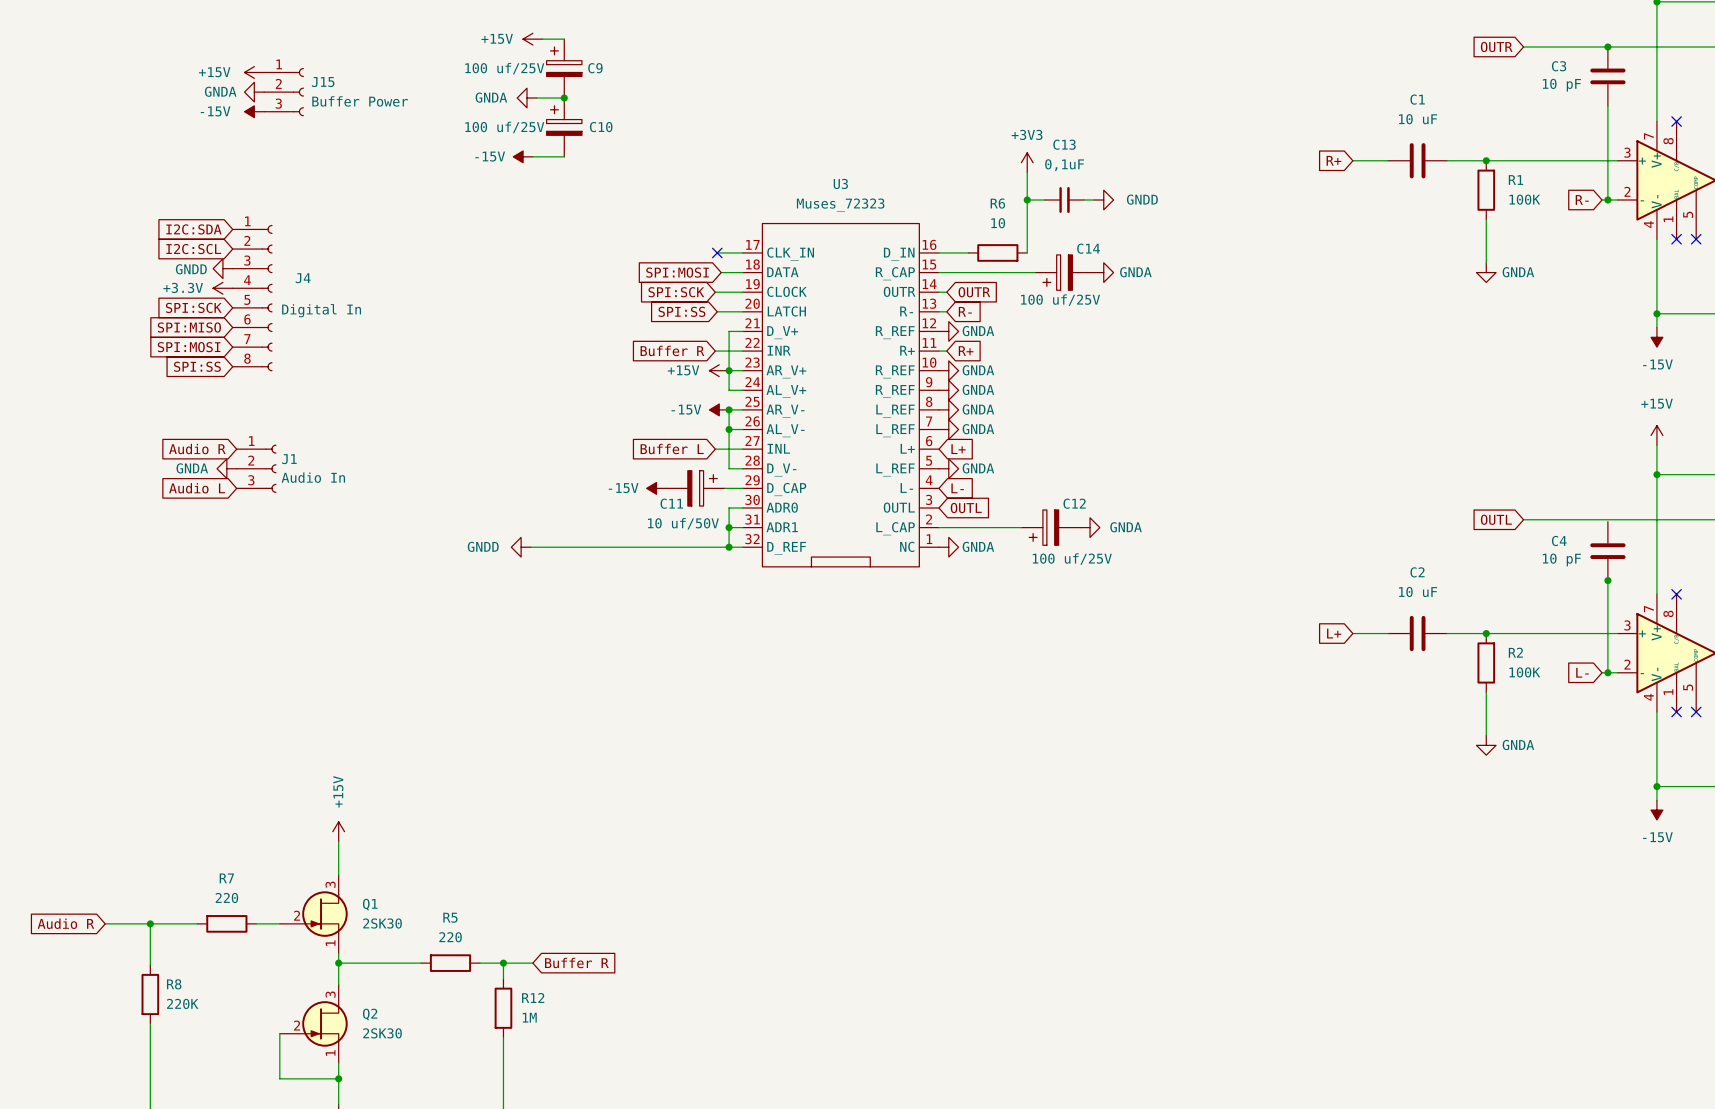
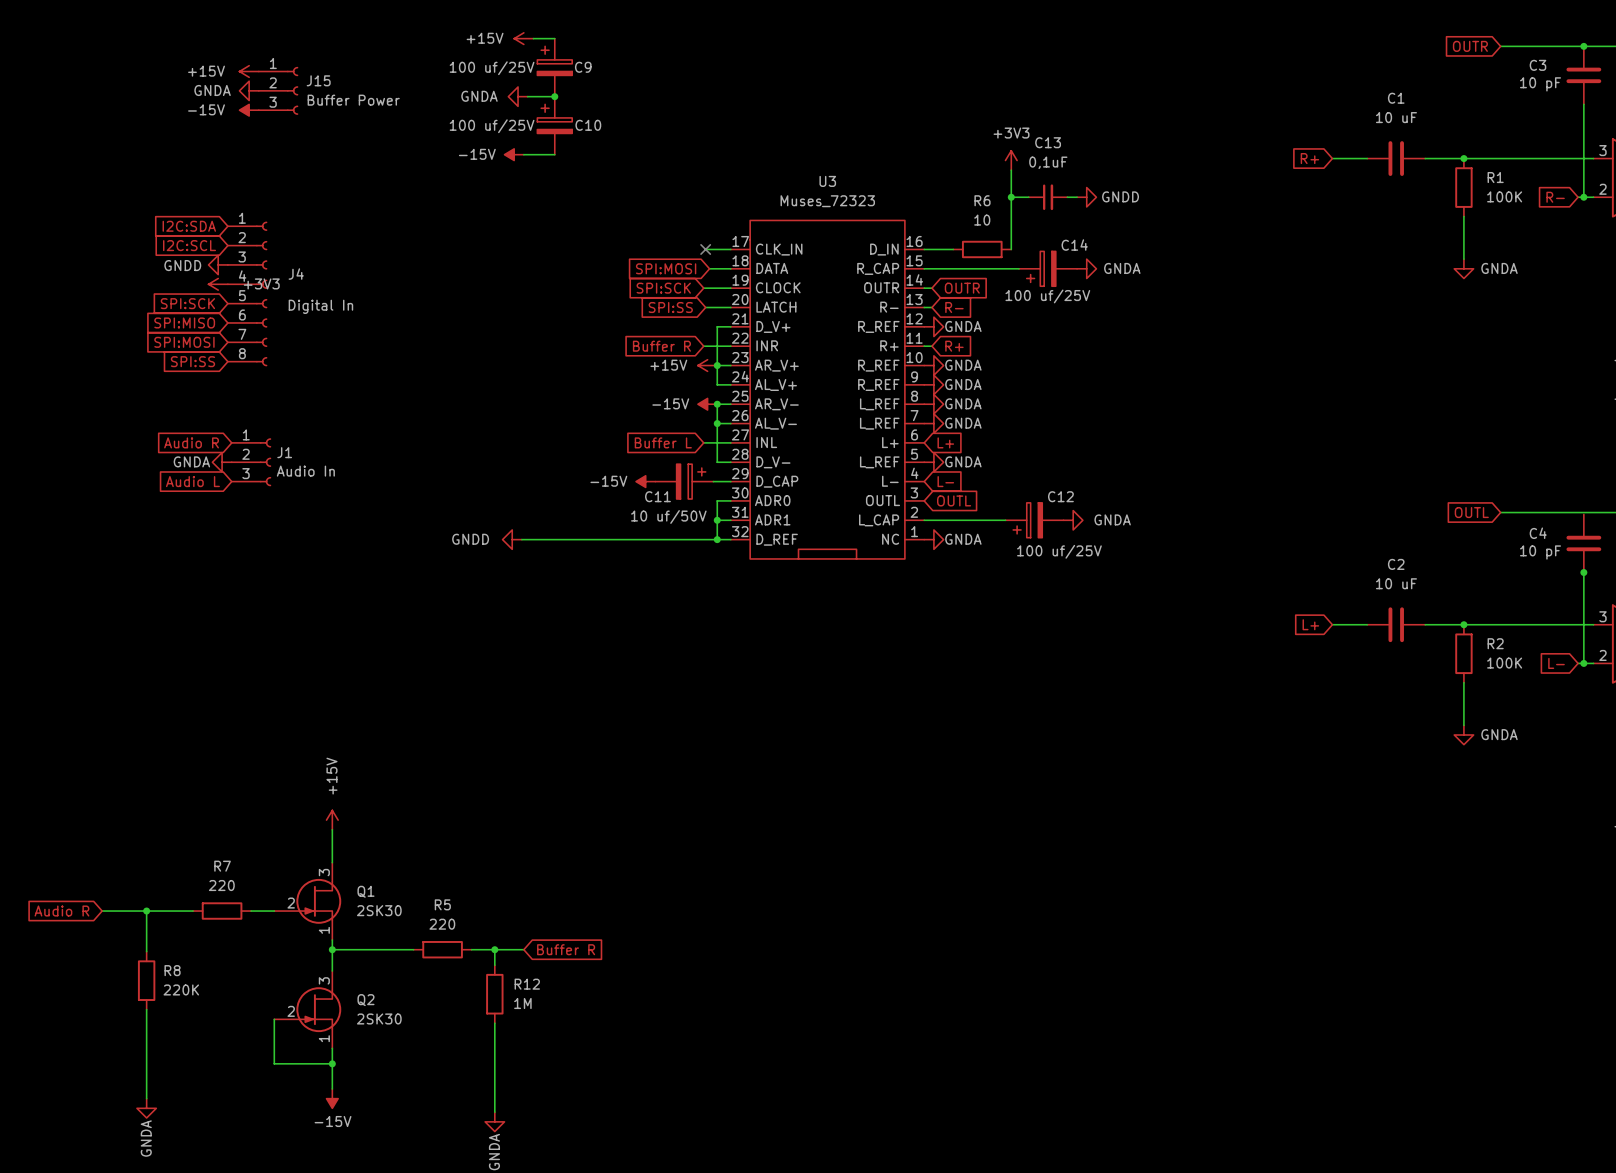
power symbol: +3.3V (222, 288) -> +3V3 (218, 284)

